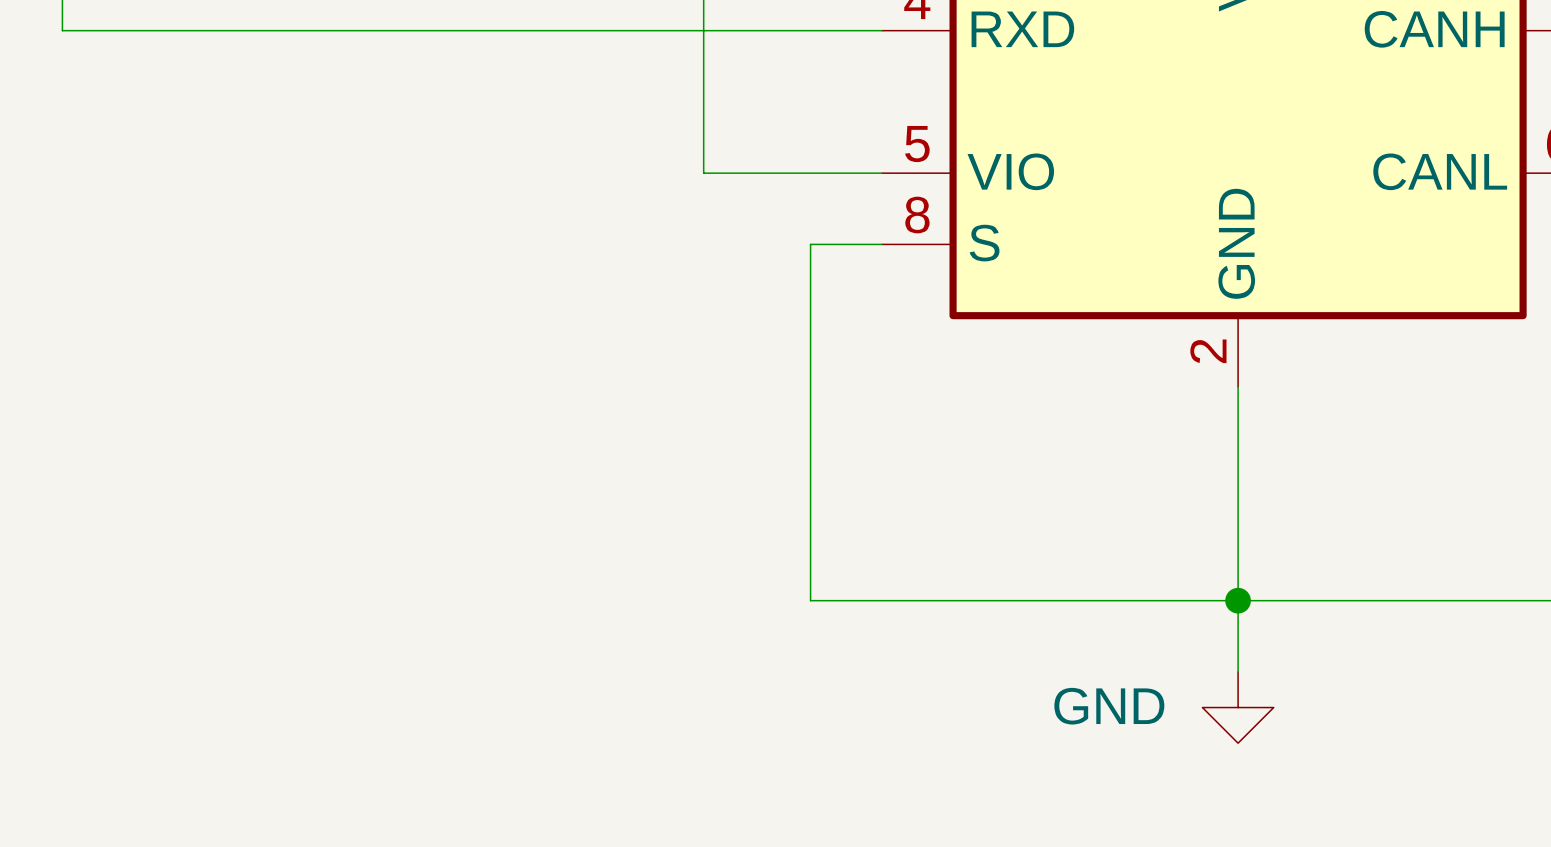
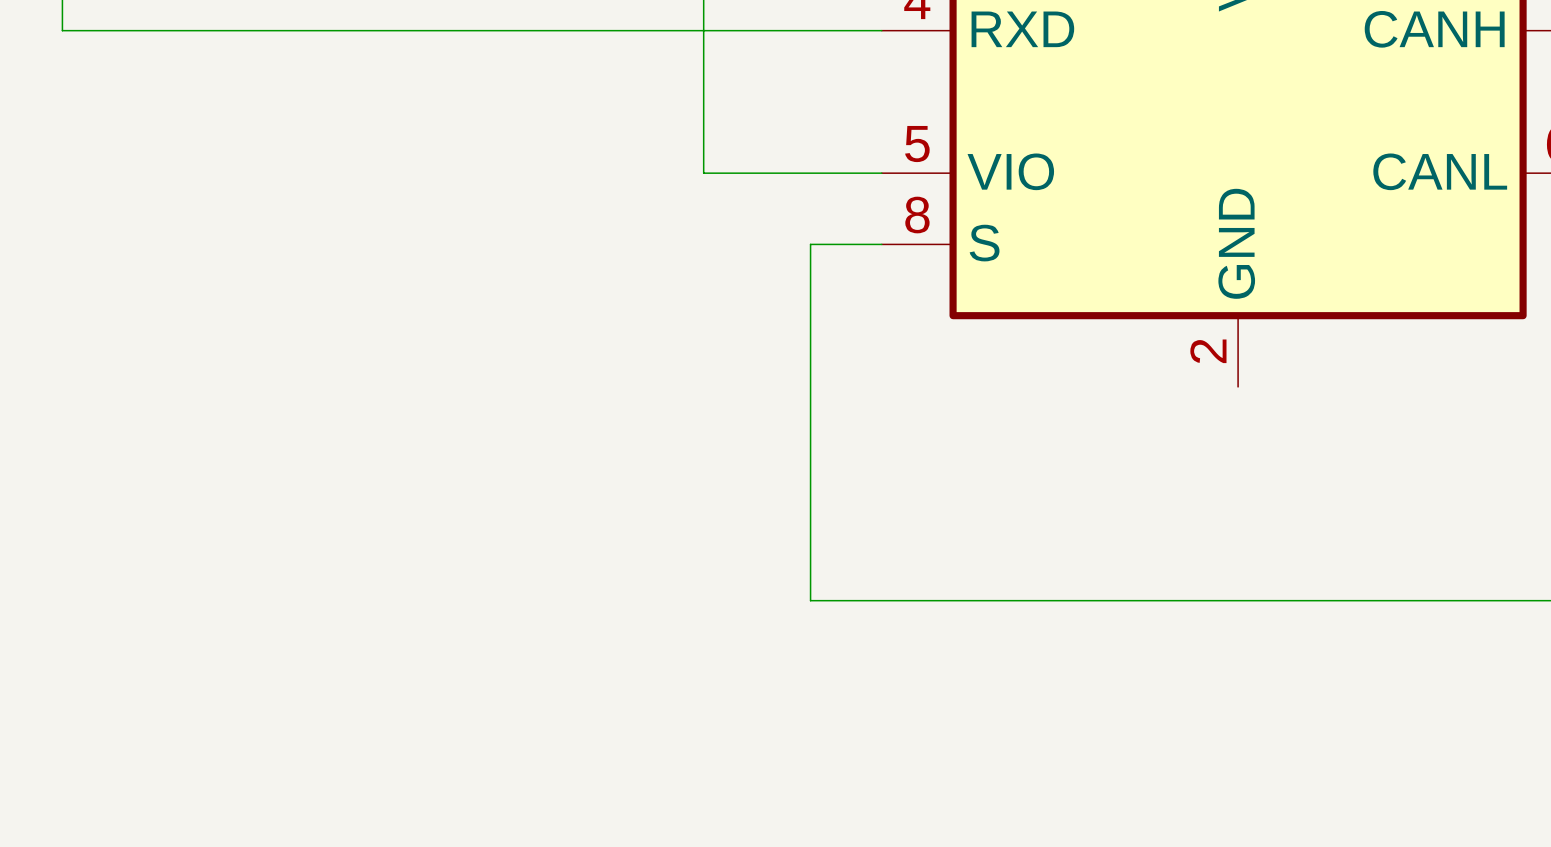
wire: (1238, 386) (1238, 671) -> none
junction: (1238, 600) -> none
power symbol: GND (1238, 707) -> none

